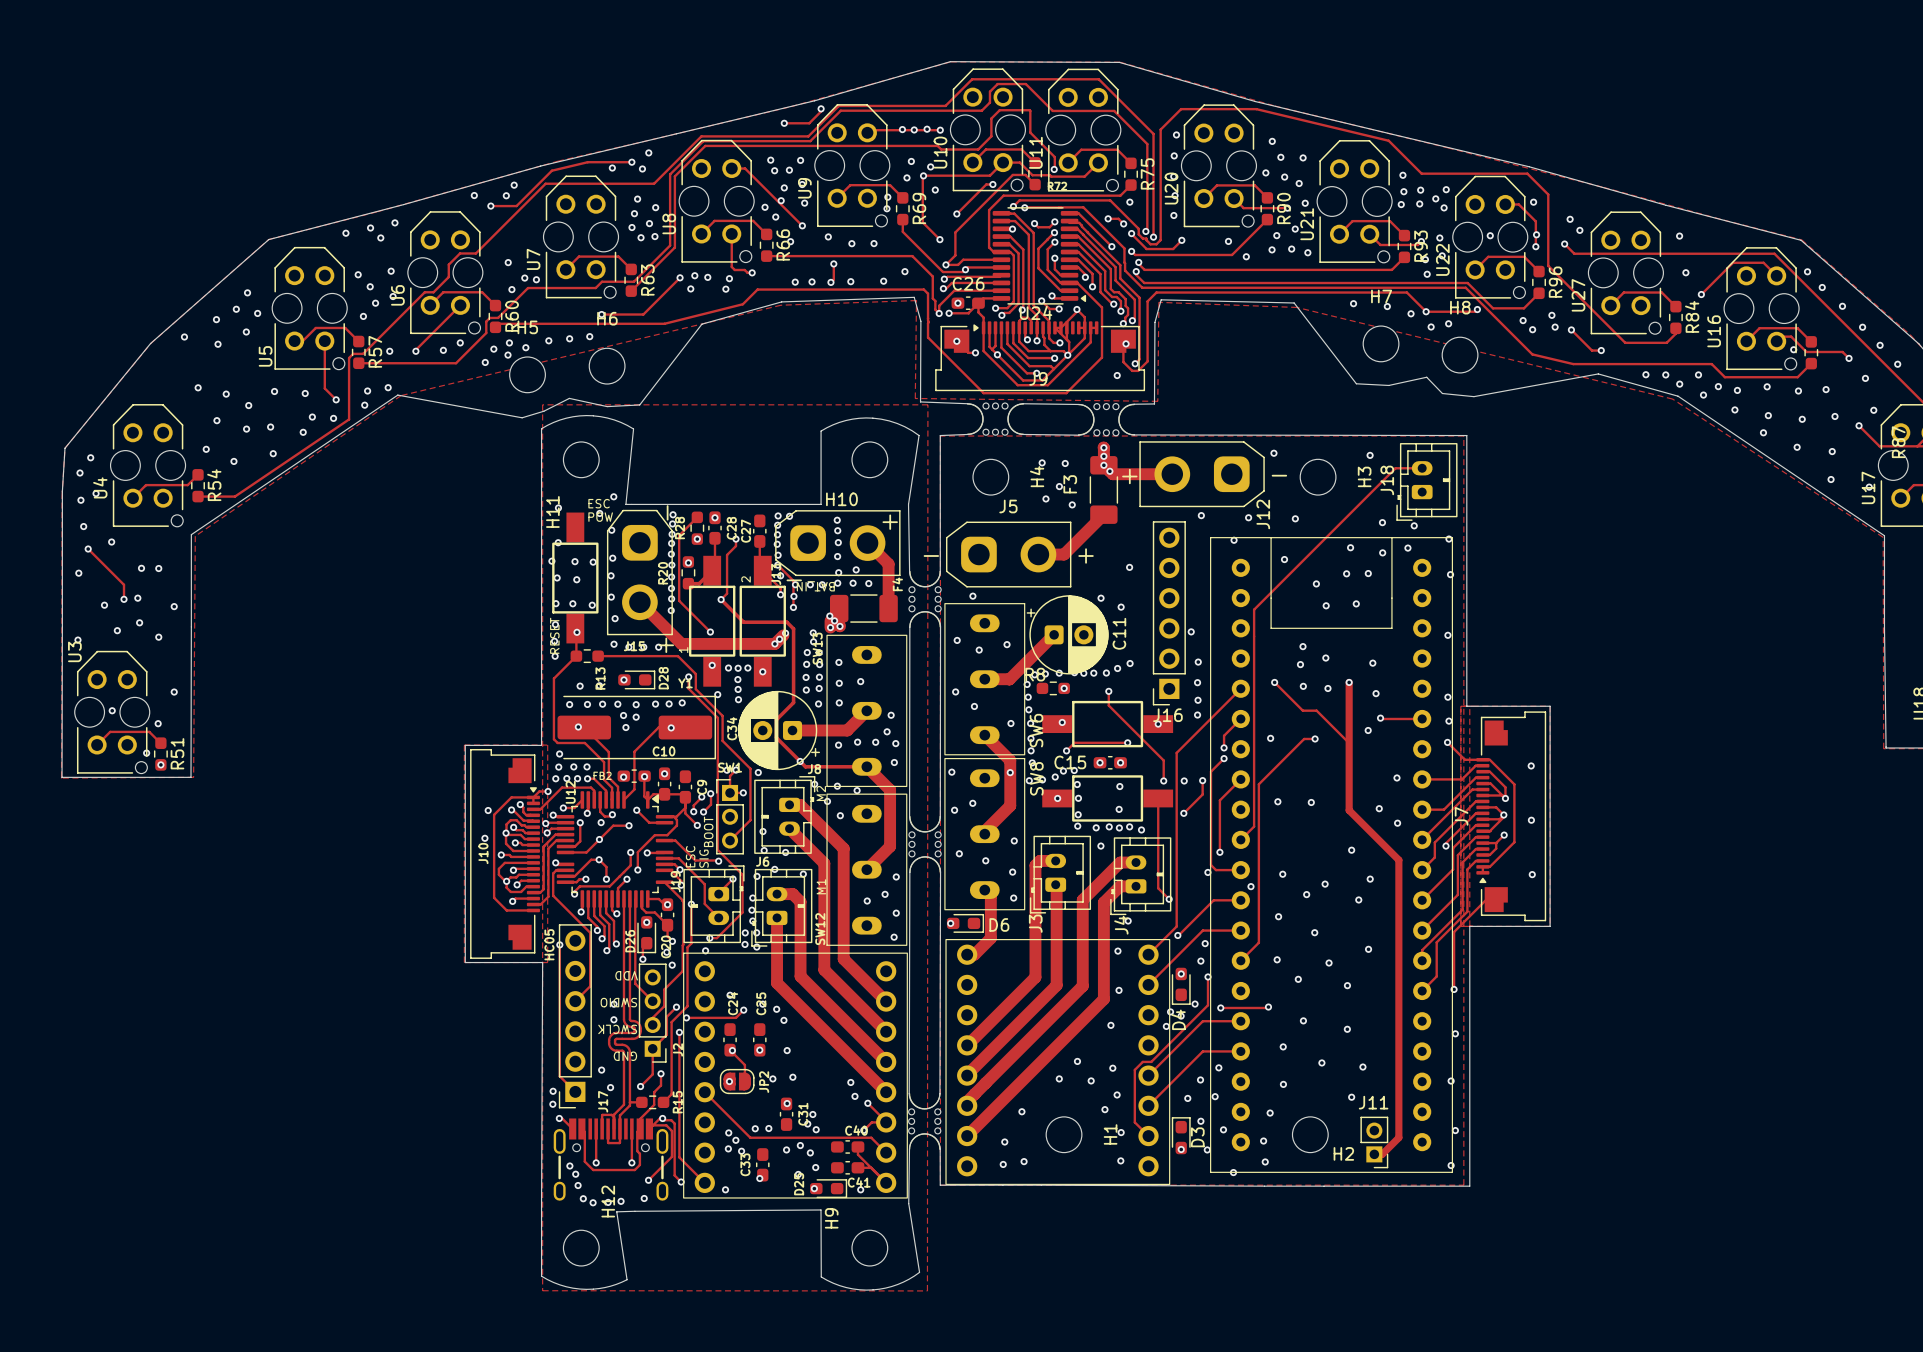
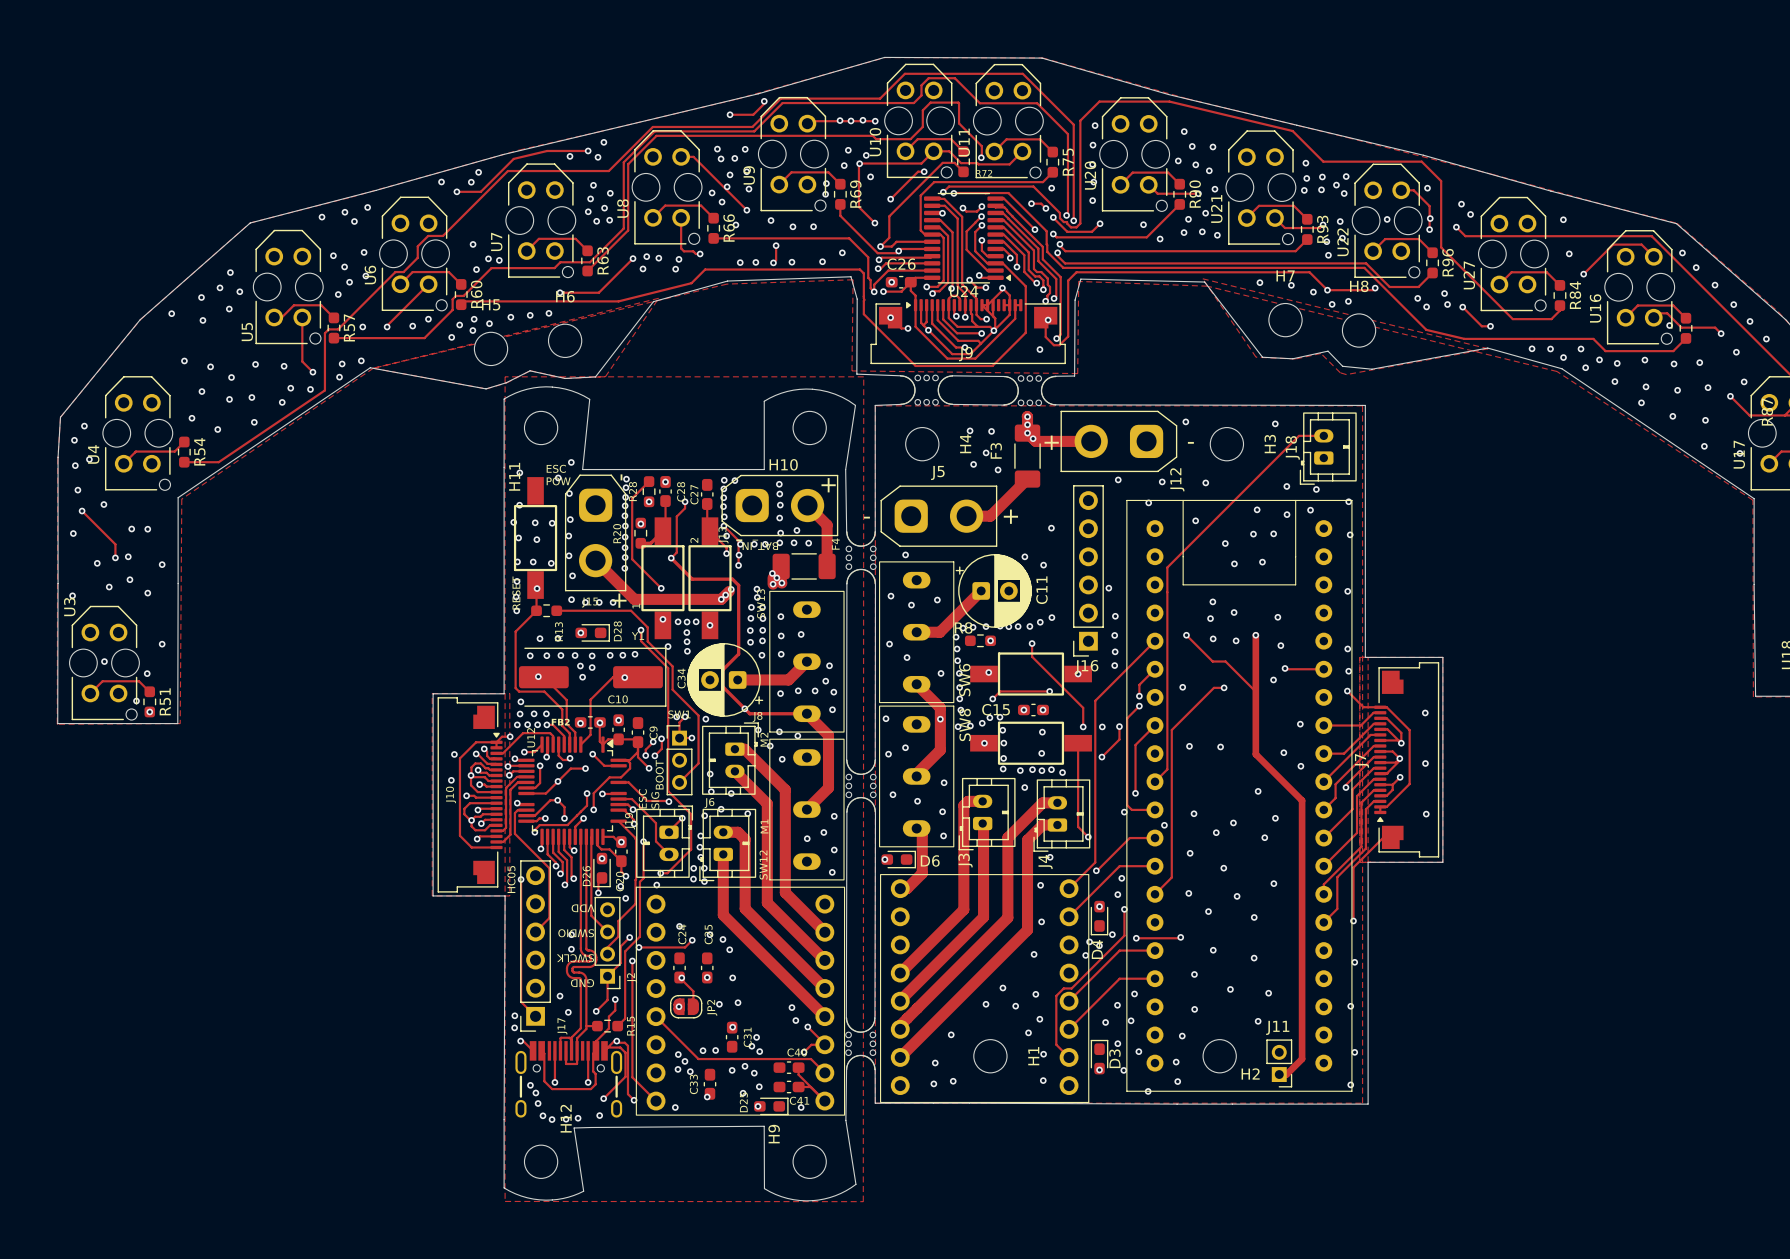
zone outline: none -> (1202, 278) (1256, 357) (1295, 358) (1320, 353) (1340, 372) (1346, 374) (1488, 348) (1202, 278)
zone outline: none -> (658, 298) (605, 376) (565, 378) (530, 370) (506, 382) (486, 388) (373, 368) (658, 298)

